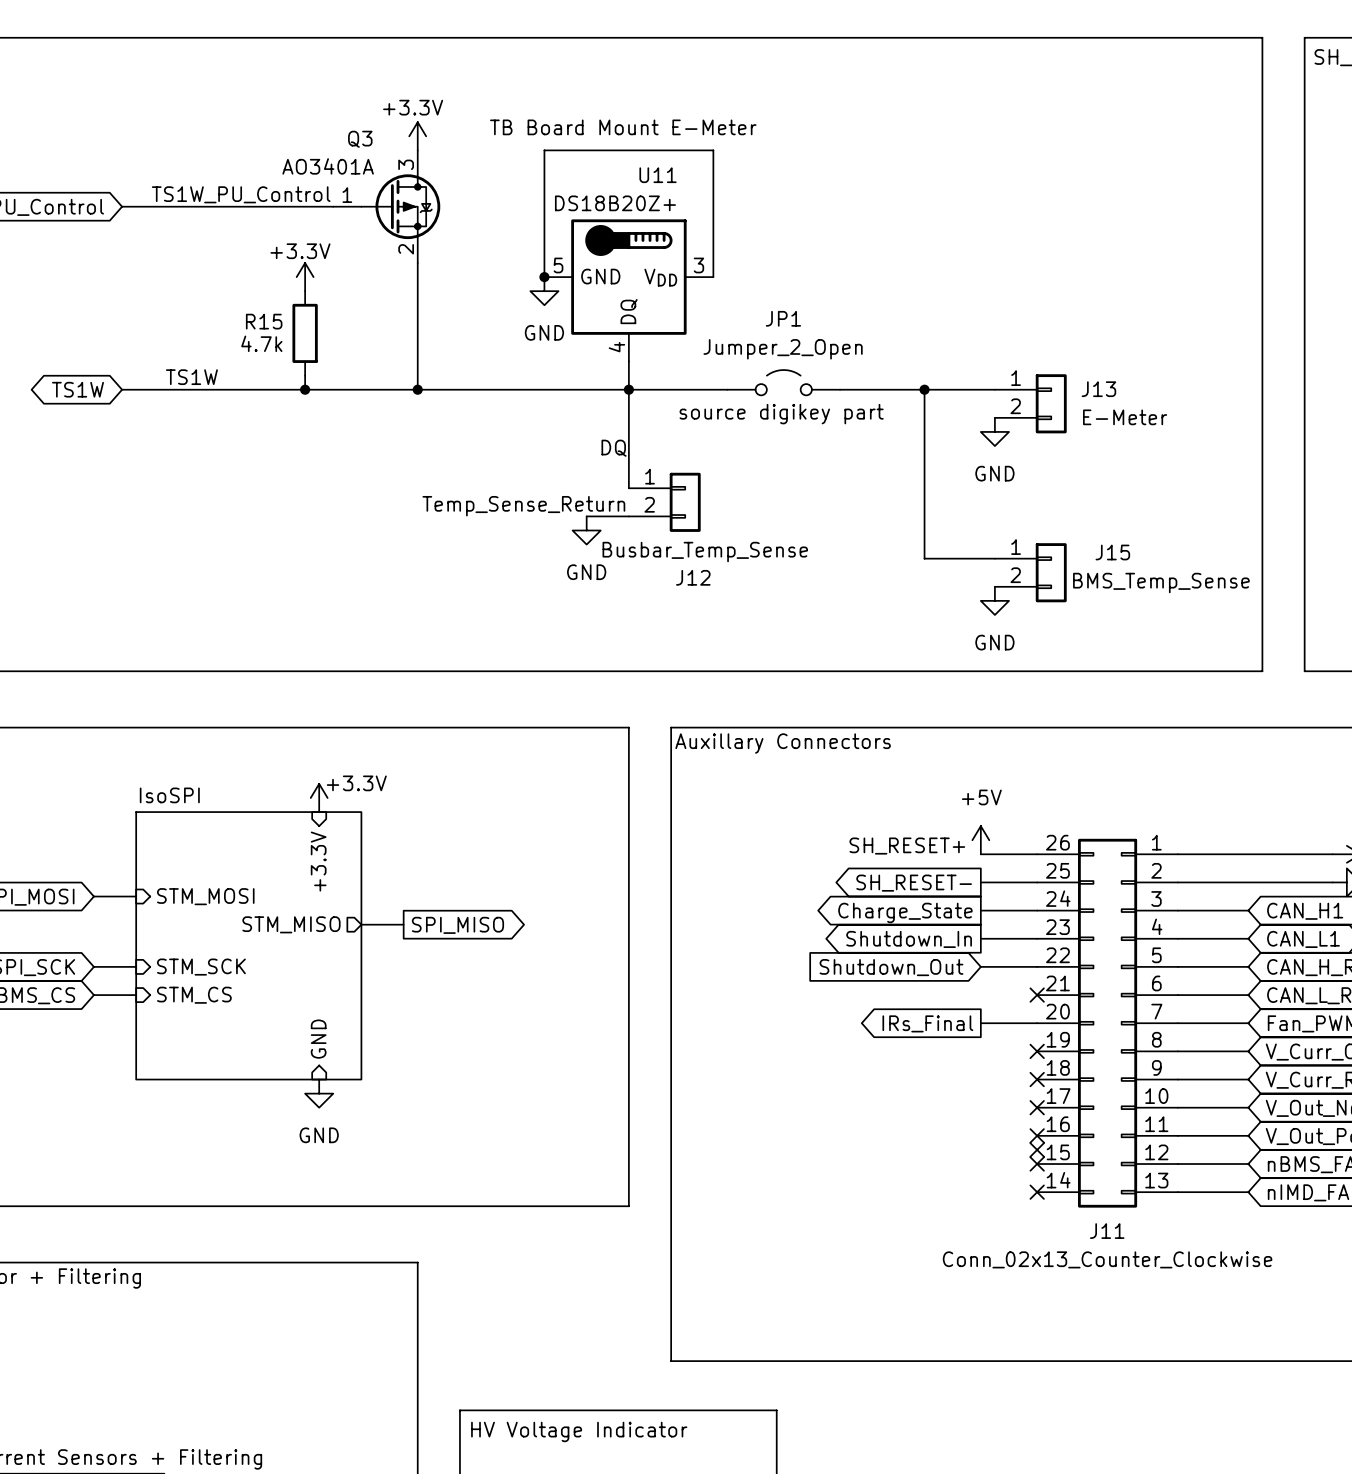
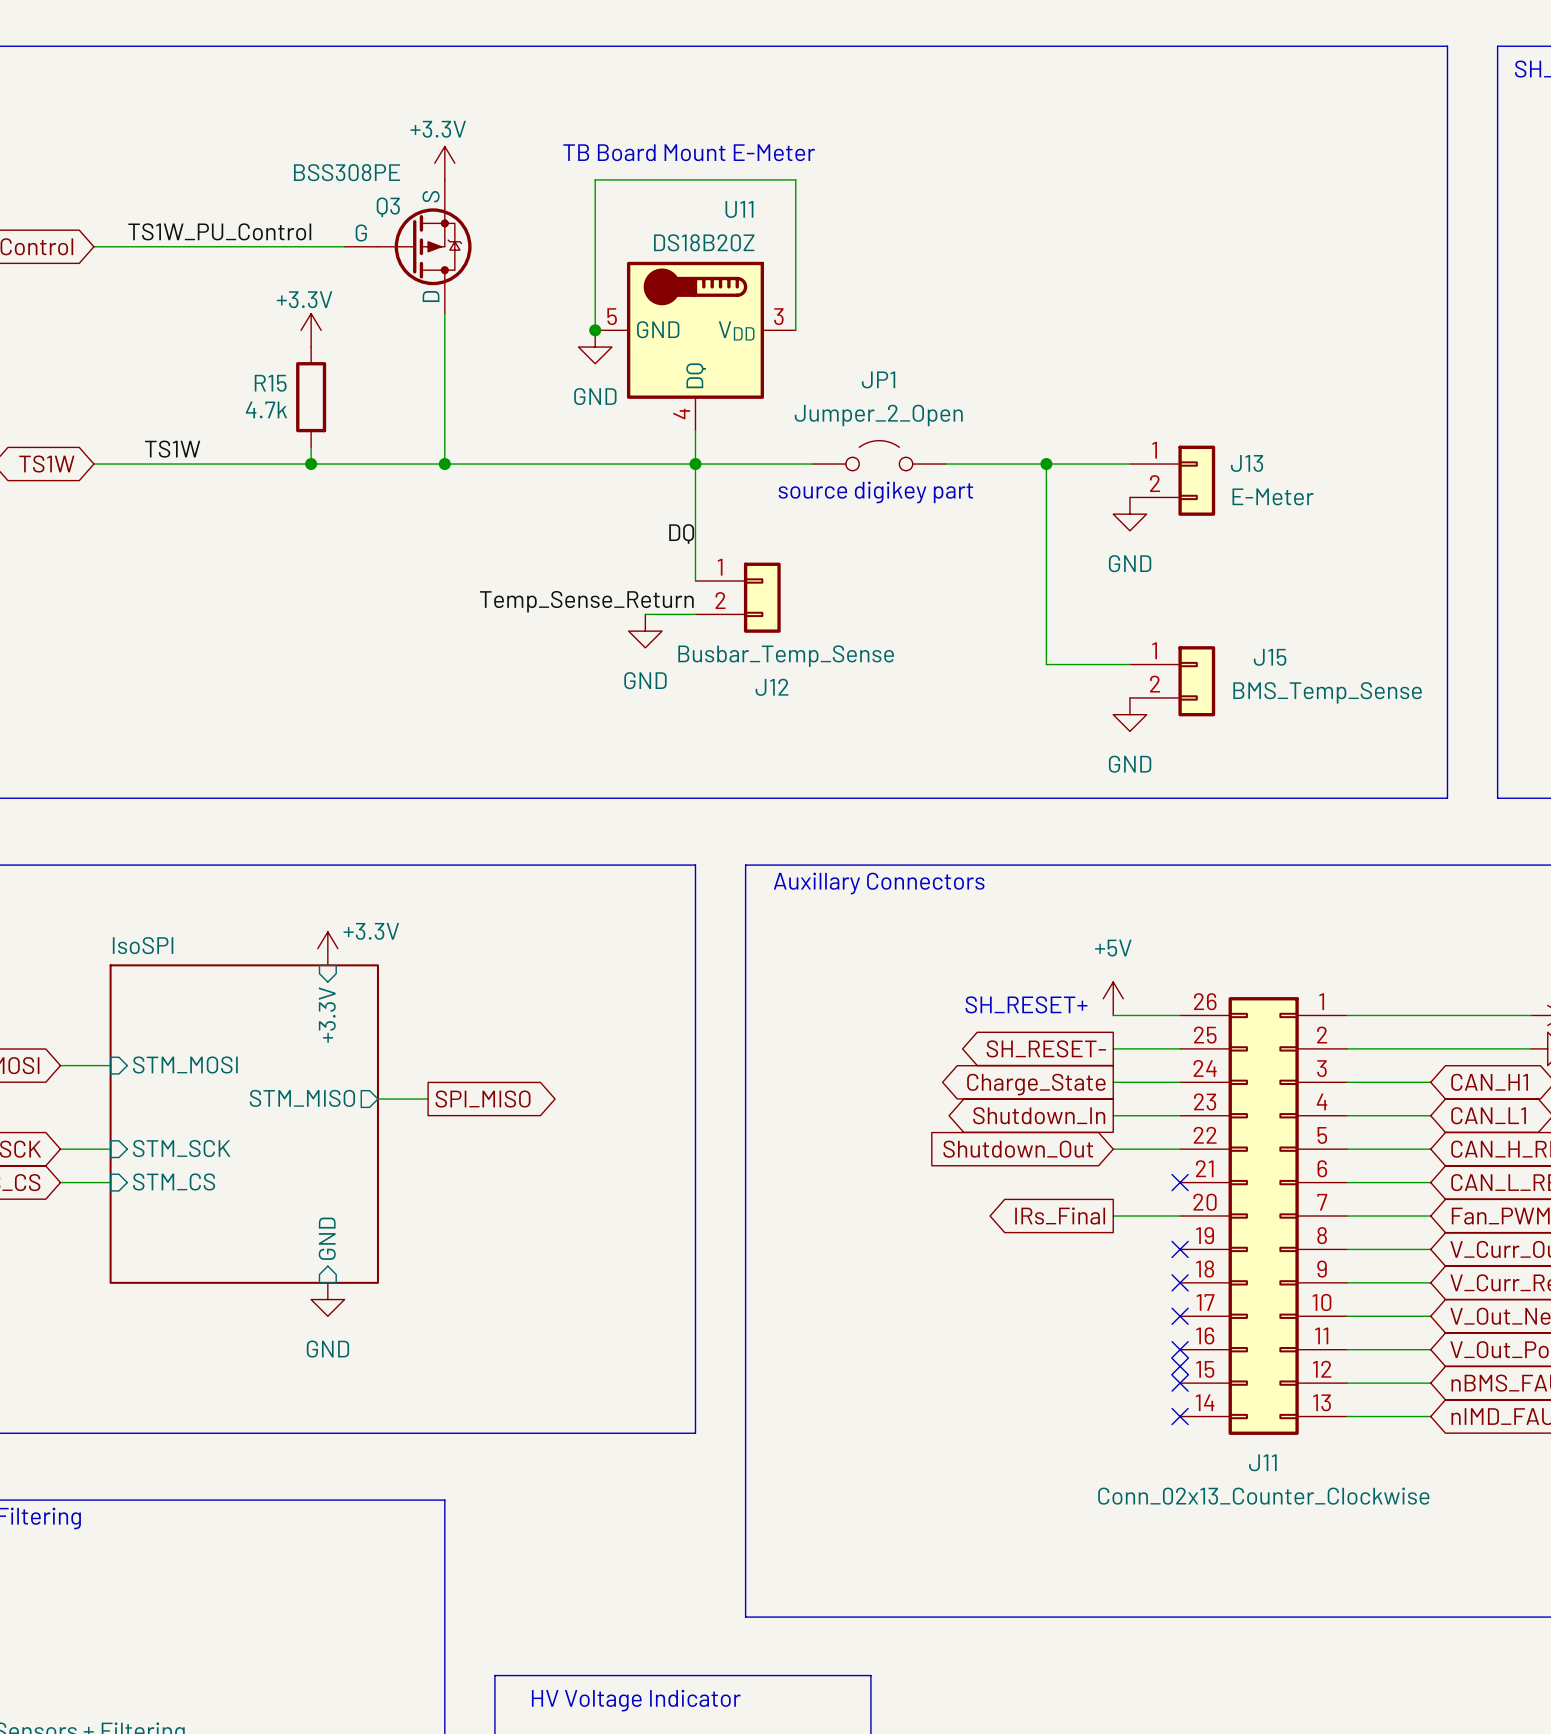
Q3 name position: Q3 (360, 139) -> Q3 (388, 207)
Q3 symbol: [333, 150, 441, 264] -> [344, 179, 472, 314]
Q3 value: AO3401A (328, 166) -> BSS308PE (346, 172)
U11 value: DS18B20Z+ (615, 203) -> DS18B20Z (704, 242)

